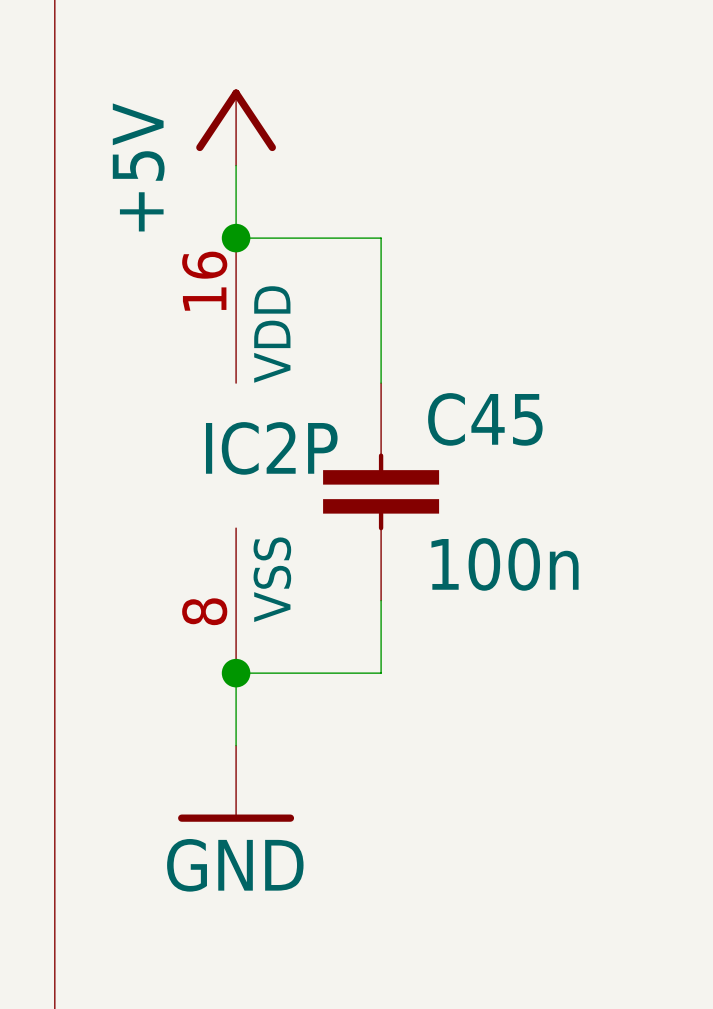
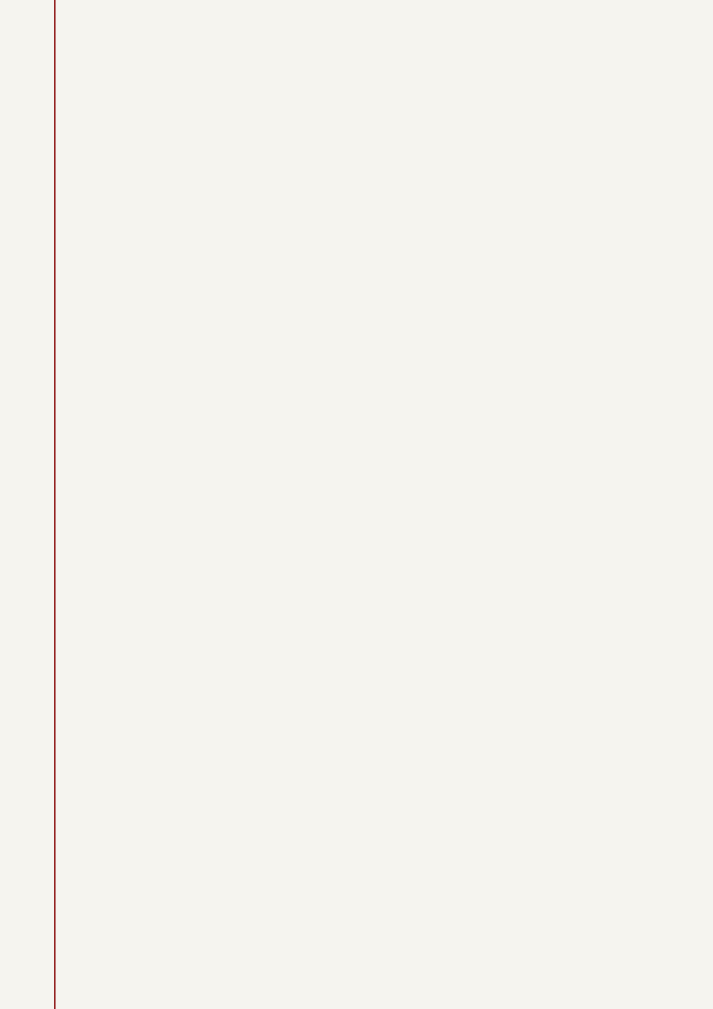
power symbol: +5V (236, 127) -> none
wire: (236, 165) (236, 238) (381, 238) (381, 383) -> none
junction: (236, 238) -> none
IC2P: (236, 455) -> none
C45: 100n (381, 491) -> none
wire: (381, 600) (381, 673) (236, 673) (236, 745) -> none
junction: (236, 673) -> none
power symbol: GND (236, 783) -> none

